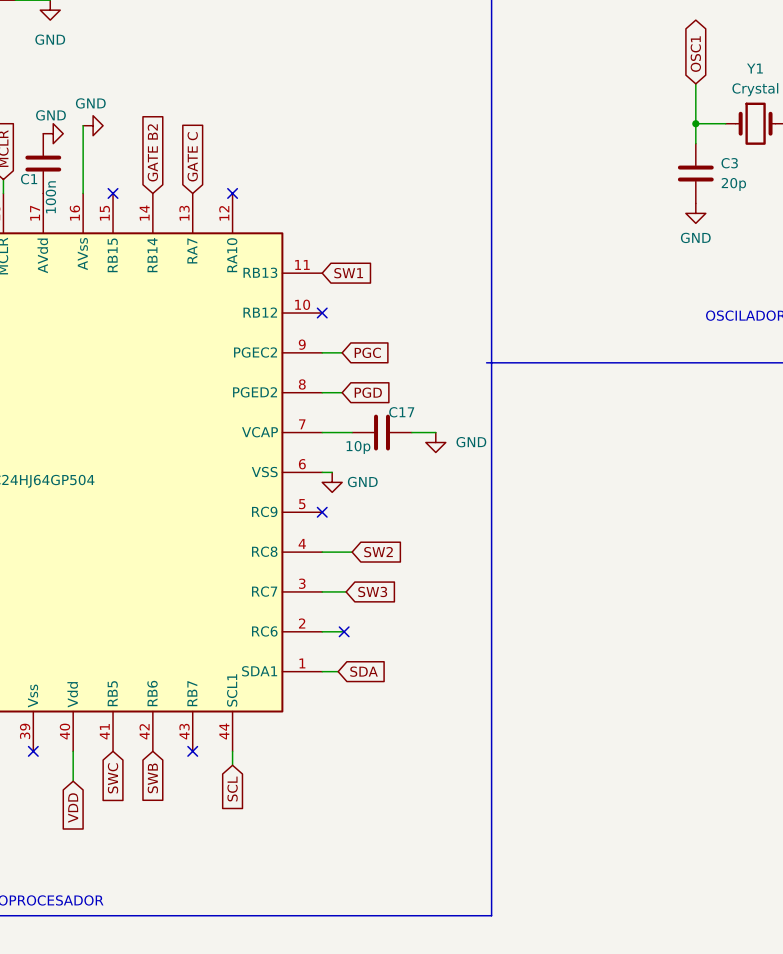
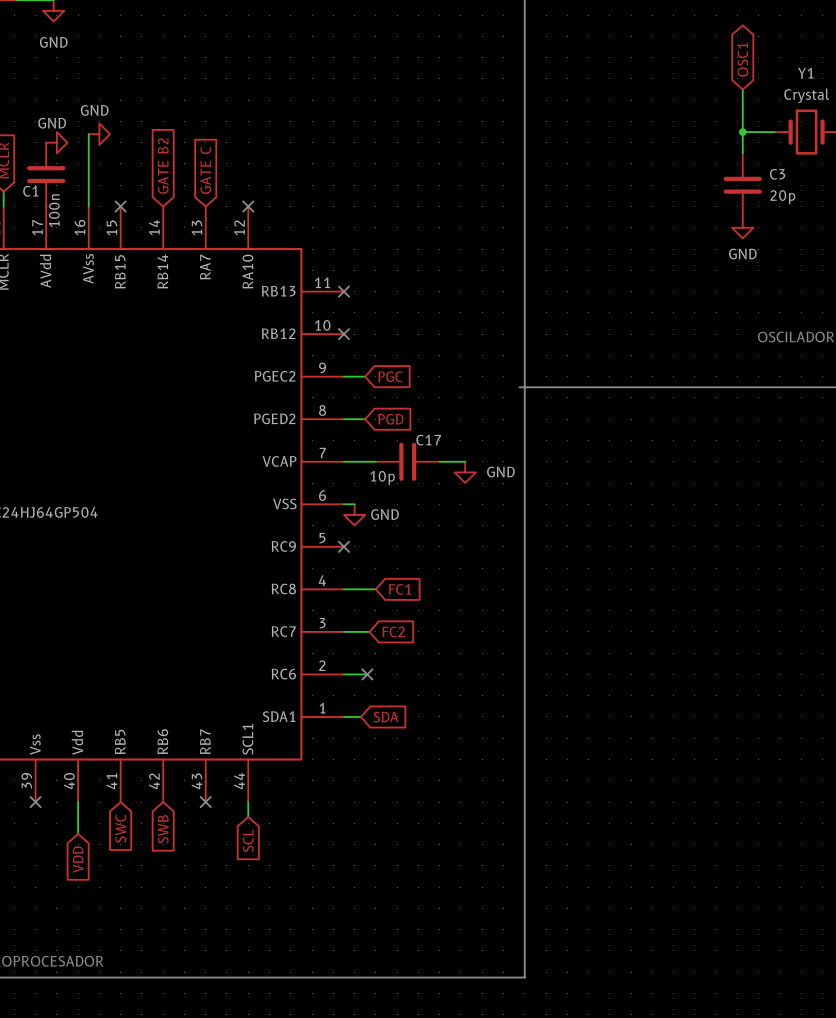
no-connect mark: none -> (343, 291)
global label: SW1 (348, 273) -> none
global label: SW2 (378, 552) -> FC1 (400, 589)
global label: SW3 (372, 591) -> FC2 (393, 631)

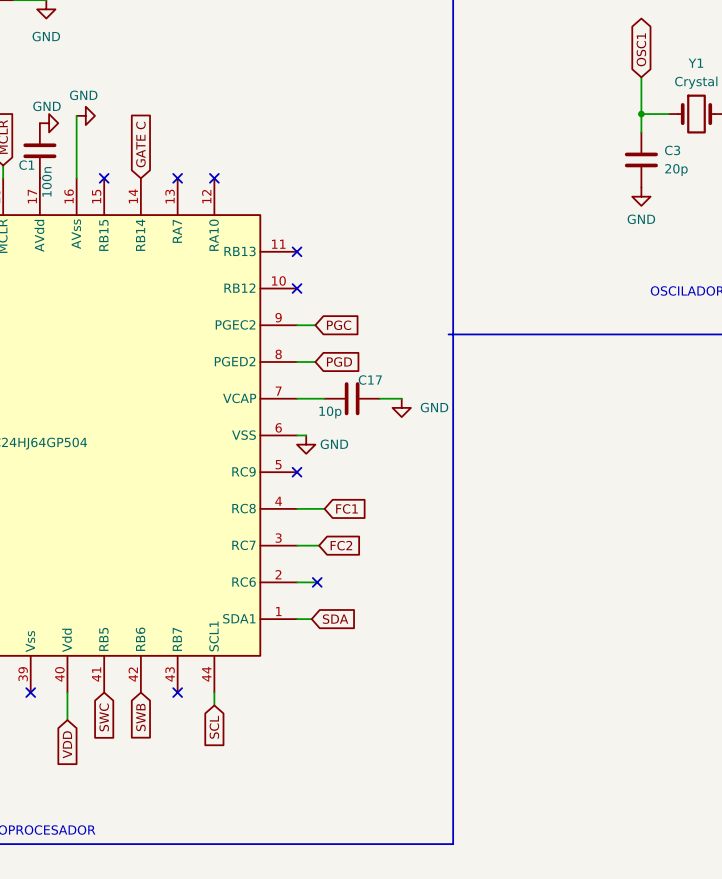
global label: GATE B2 (163, 166) -> GATE C (140, 144)
global label: GATE C (205, 170) -> none
no-connect mark: none -> (177, 178)

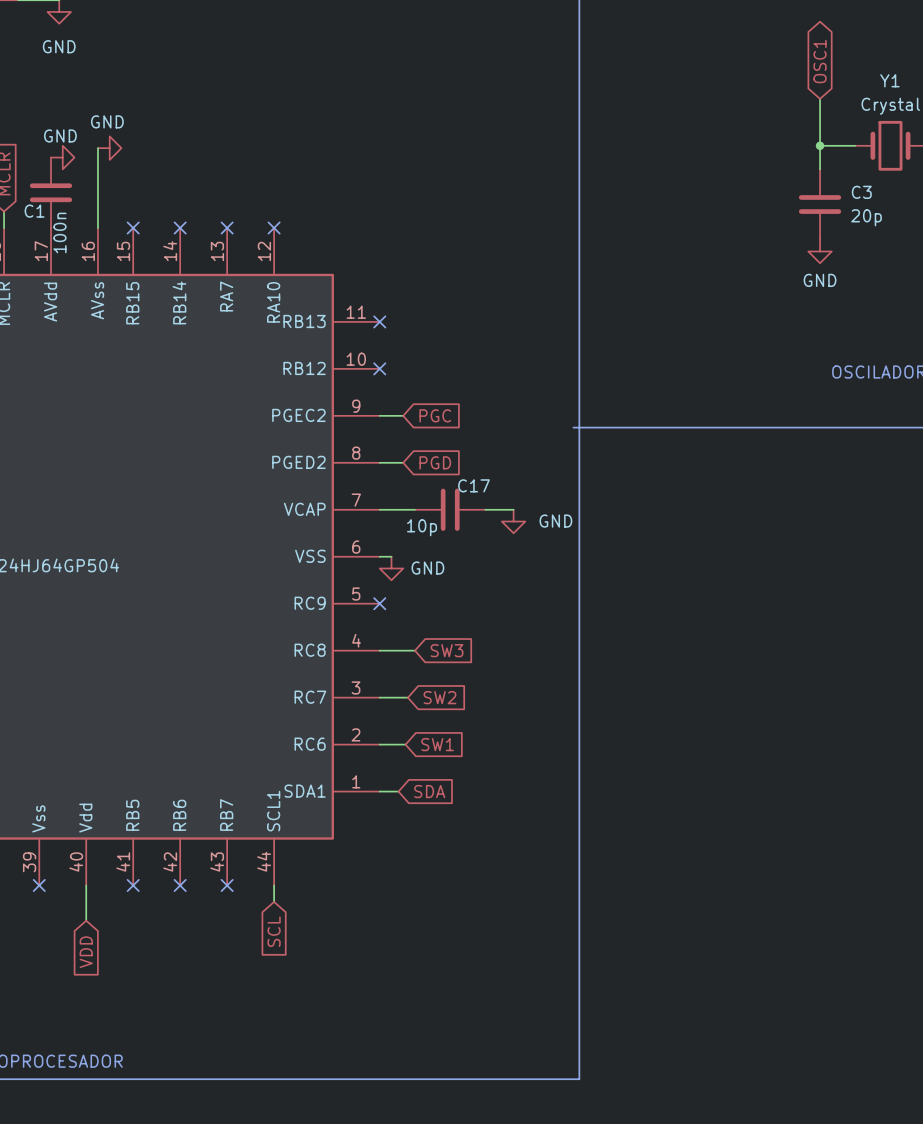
global label: GATE C (140, 144) -> none
no-connect mark: none -> (180, 228)
global label: FC1 (346, 508) -> SW3 (447, 650)
global label: FC2 (341, 545) -> SW2 (439, 697)
no-connect mark: (317, 582) -> none
global label: none -> SW1 (437, 744)
no-connect mark: none -> (133, 885)
no-connect mark: none -> (180, 885)
global label: SWC (104, 717) -> none
global label: SWB (140, 717) -> none

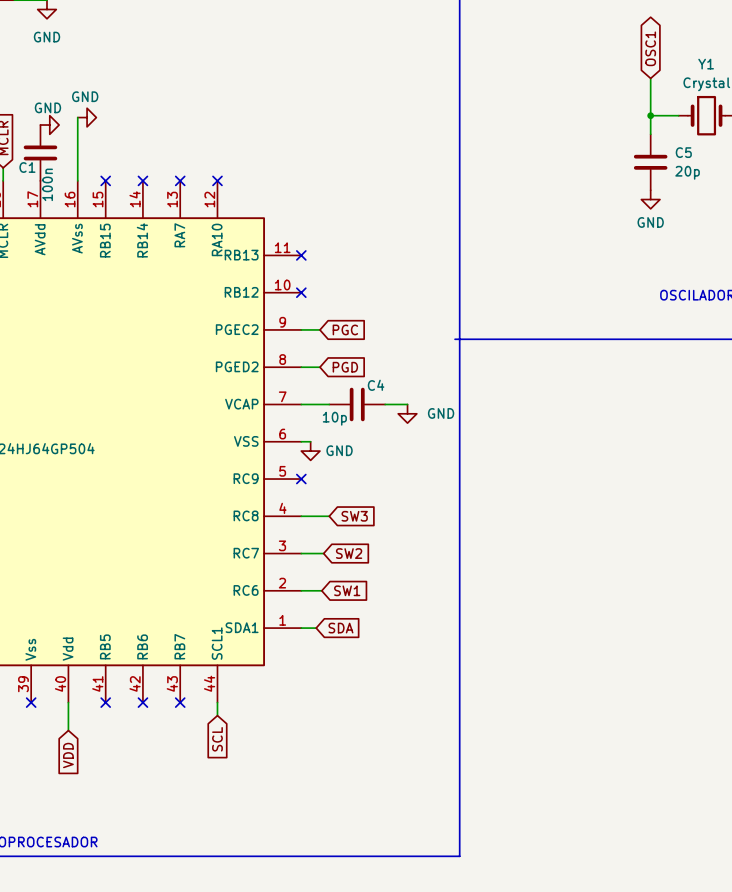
C3 name: C3 (861, 192) -> C5 (683, 152)
C17 name: C17 (473, 485) -> C4 (376, 385)

